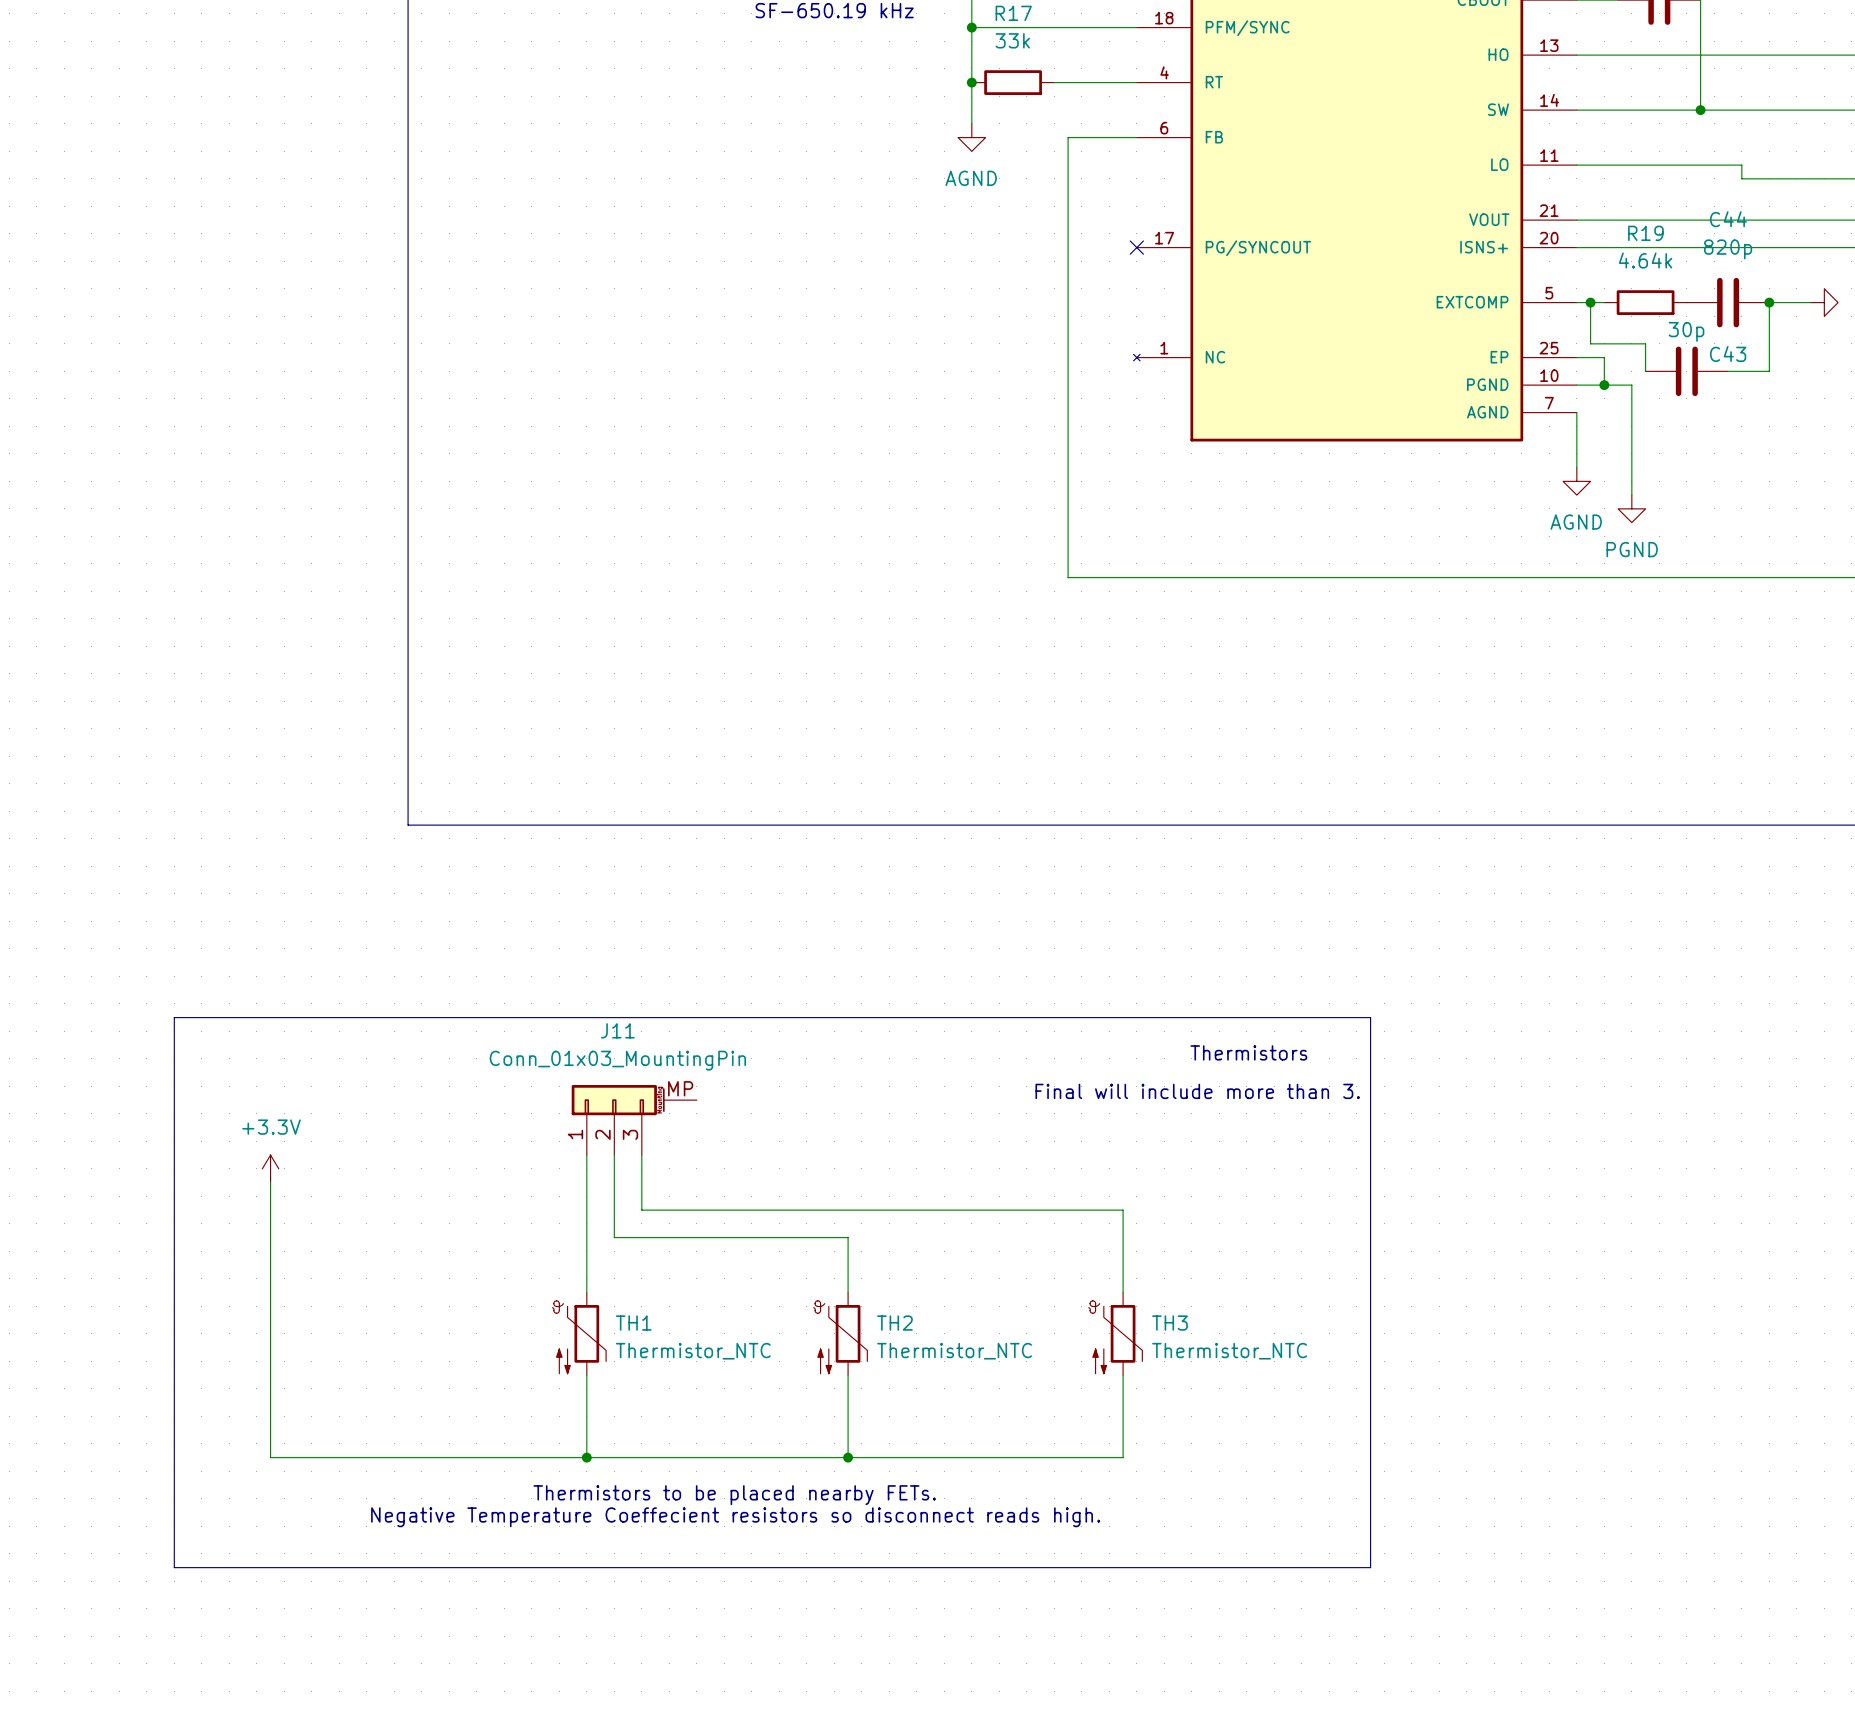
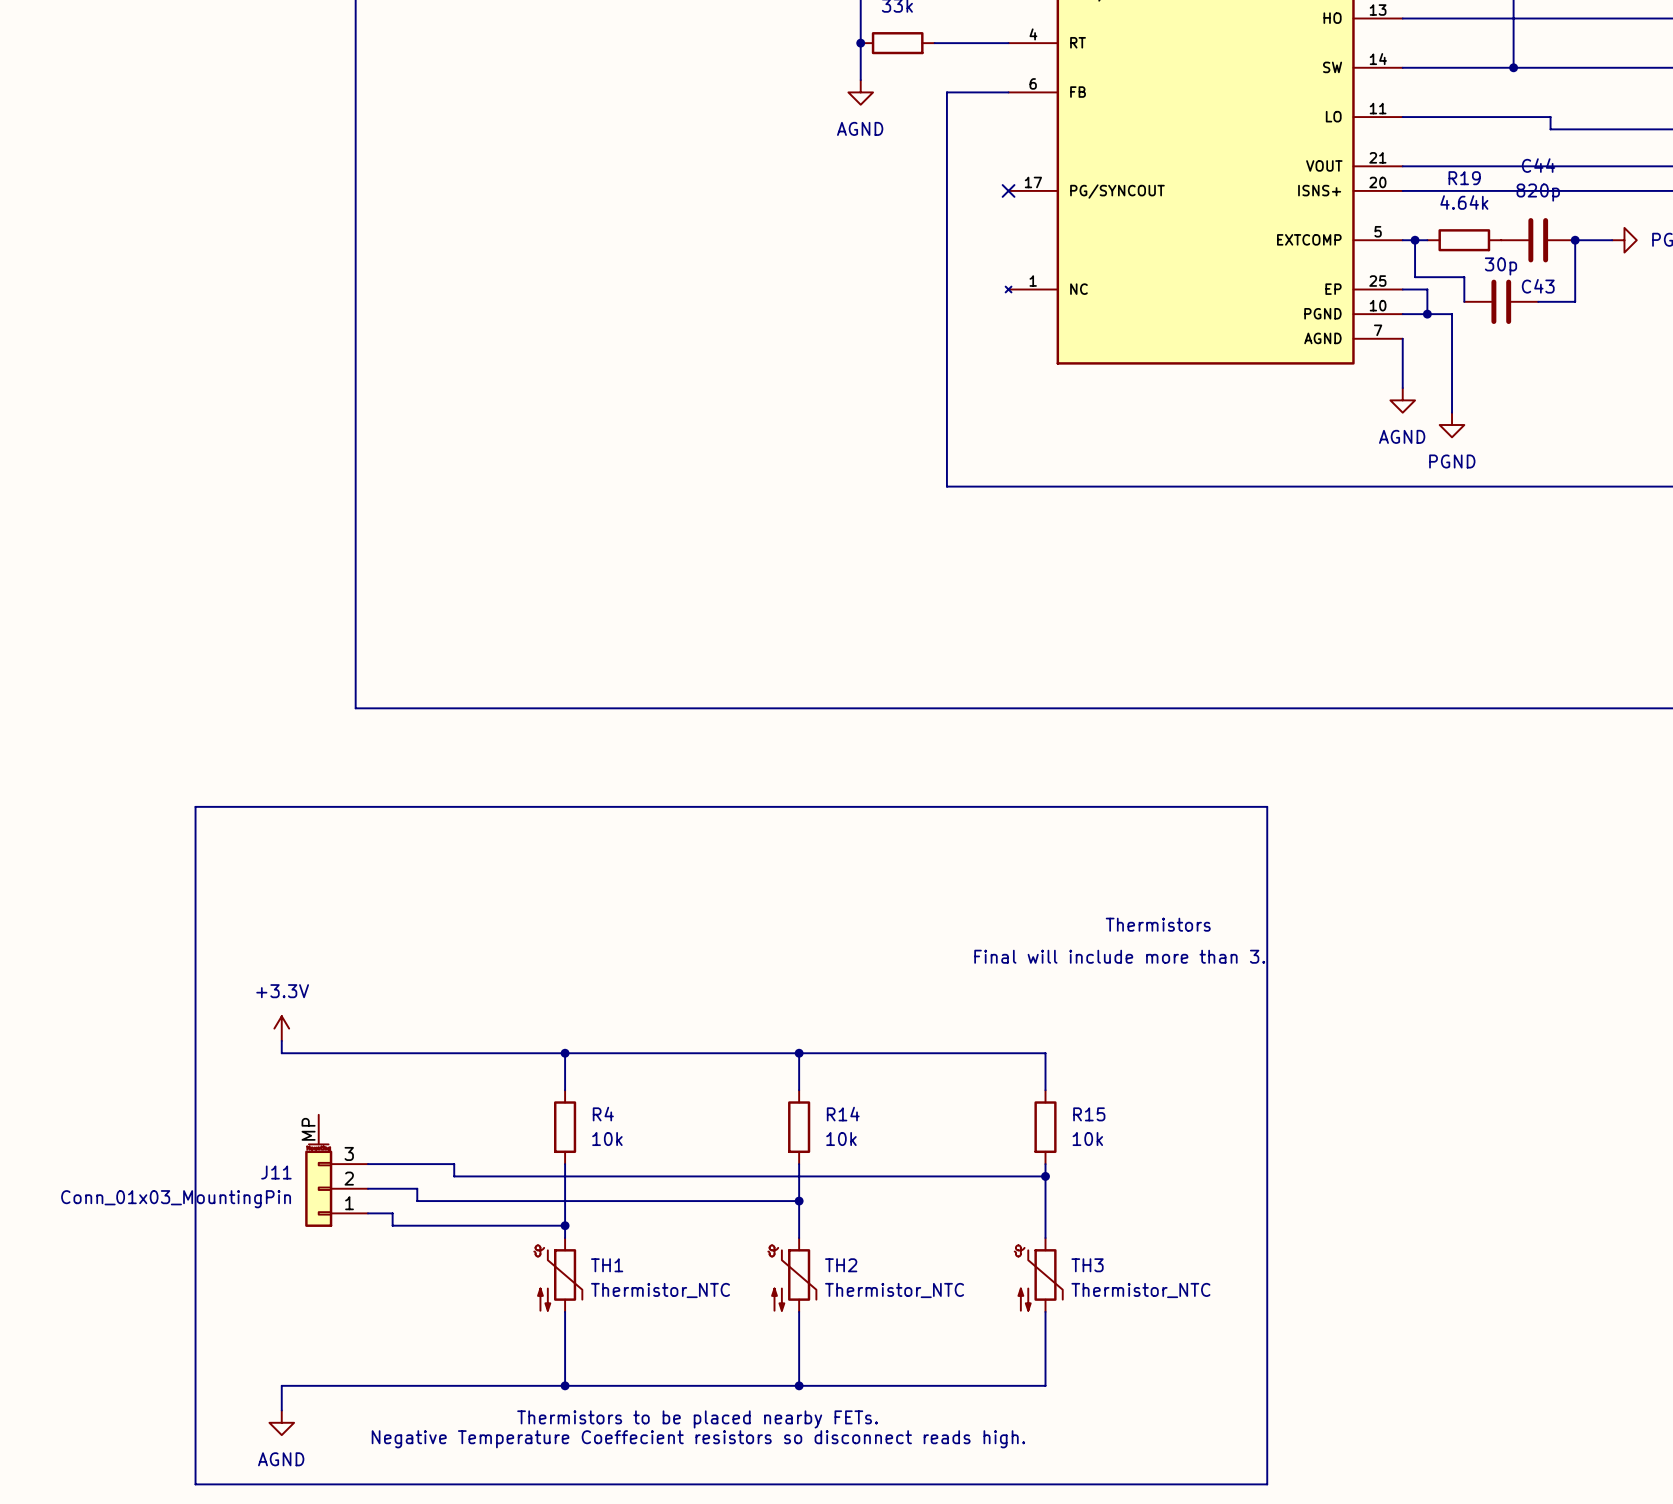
line: (174, 1017) (1370, 1017) (1370, 1567) (174, 1567) (174, 1017) -> (195, 806) (195, 1484) (1267, 1484) (1267, 806) (195, 806)
J11 name position: J11 (617, 1030) -> J11 (276, 1172)
text position: Thermistors (1248, 1052) -> Thermistors (1158, 924)
J11 value position: Conn_01x03_MountingPin (617, 1060) -> Conn_01x03_MountingPin (176, 1199)
text position: Final will include more than 3. (1197, 1091) -> Final will include more than 3. (1119, 956)
J11 rotation: 0° (618, 1100) -> 90° counterclockwise (318, 1185)
J11 position: (634, 1120) -> (336, 1170)
wire: (586, 1155) (586, 1292) -> none
wire: (614, 1155) (614, 1237) (848, 1237) (848, 1292) -> none
wire: (641, 1155) (641, 1210) -> none
power symbol position: +3.3V (270, 1168) -> +3.3V (281, 1028)
wire: (270, 1182) (270, 1457) (1123, 1457) (1123, 1375) -> none
wire: none -> (281, 1040) (281, 1053) (565, 1053) (565, 1090)
junction: none -> (565, 1053)
wire: none -> (799, 1053) (799, 1090)
junction: none -> (799, 1053)
wire: (1123, 1210) (1123, 1292) -> (996, 1053) (1045, 1053) (1045, 1090)
R4: none -> 10k (565, 1127)
R14: none -> 10k (799, 1127)
R15: none -> 10k (1045, 1127)
wire: none -> (367, 1164) (454, 1164) (454, 1176) (1045, 1176)
TH1 position: (579, 1333) -> (558, 1274)
wire: none -> (565, 1164) (565, 1238)
TH2 position: (840, 1333) -> (792, 1274)
wire: none -> (799, 1164) (799, 1238)
TH3 position: (1115, 1333) -> (1038, 1274)
wire: none -> (1045, 1164) (1045, 1238)
junction: none -> (1045, 1176)
wire: none -> (367, 1188) (417, 1188) (417, 1201) (799, 1201)
wire: (586, 1375) (586, 1457) -> (565, 1311) (565, 1385)
wire: (848, 1375) (848, 1457) -> (799, 1311) (799, 1385)
junction: none -> (799, 1201)
wire: none -> (367, 1213) (392, 1213) (392, 1225) (565, 1225)
junction: none -> (565, 1225)
junction: (586, 1457) -> none
junction: (848, 1457) -> none
text position: Thermistors to be placed nearby FETs. (734, 1495) -> Thermistors to be placed nearby FETs. (697, 1419)
wire: none -> (1045, 1311) (1045, 1385) (281, 1385) (281, 1410)
text position: Negative Temperature Coeffecient resistors so disconnect reads high. (735, 1517) -> Negative Temperature Coeffecient resistors so disconnect reads high. (698, 1439)
junction: none -> (565, 1385)
junction: none -> (799, 1385)
power symbol: none -> AGND (281, 1422)

